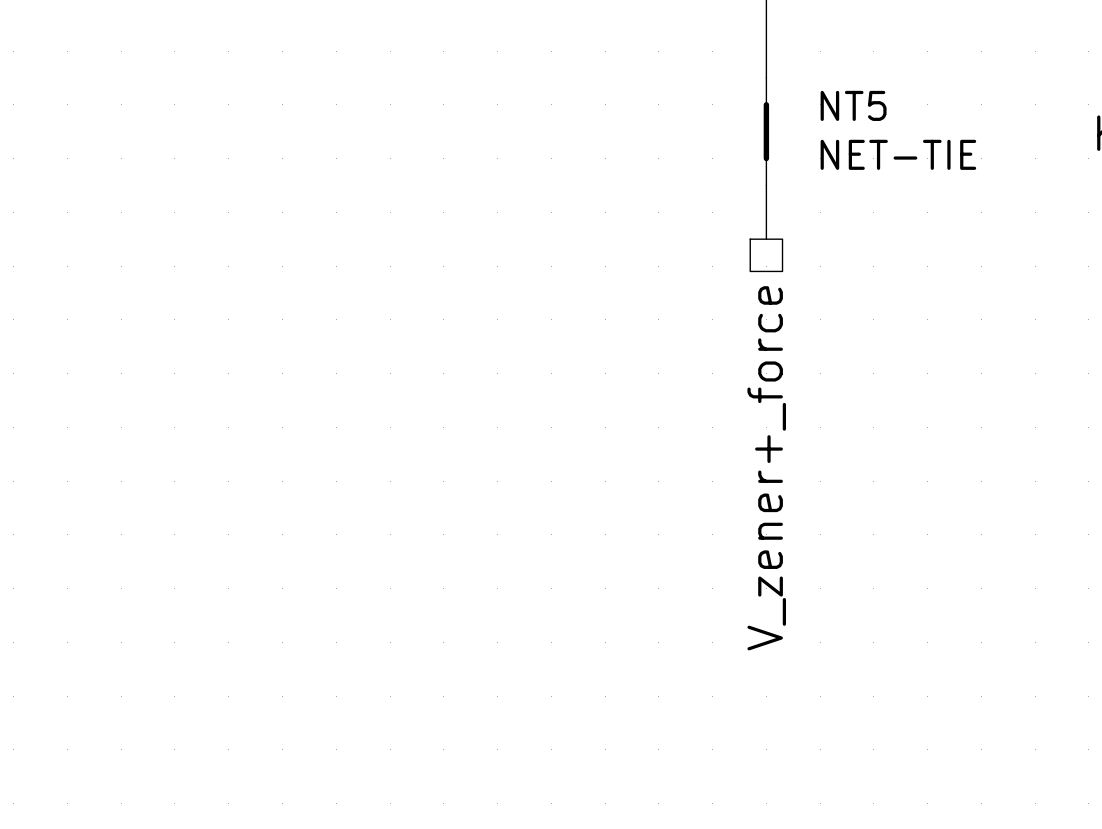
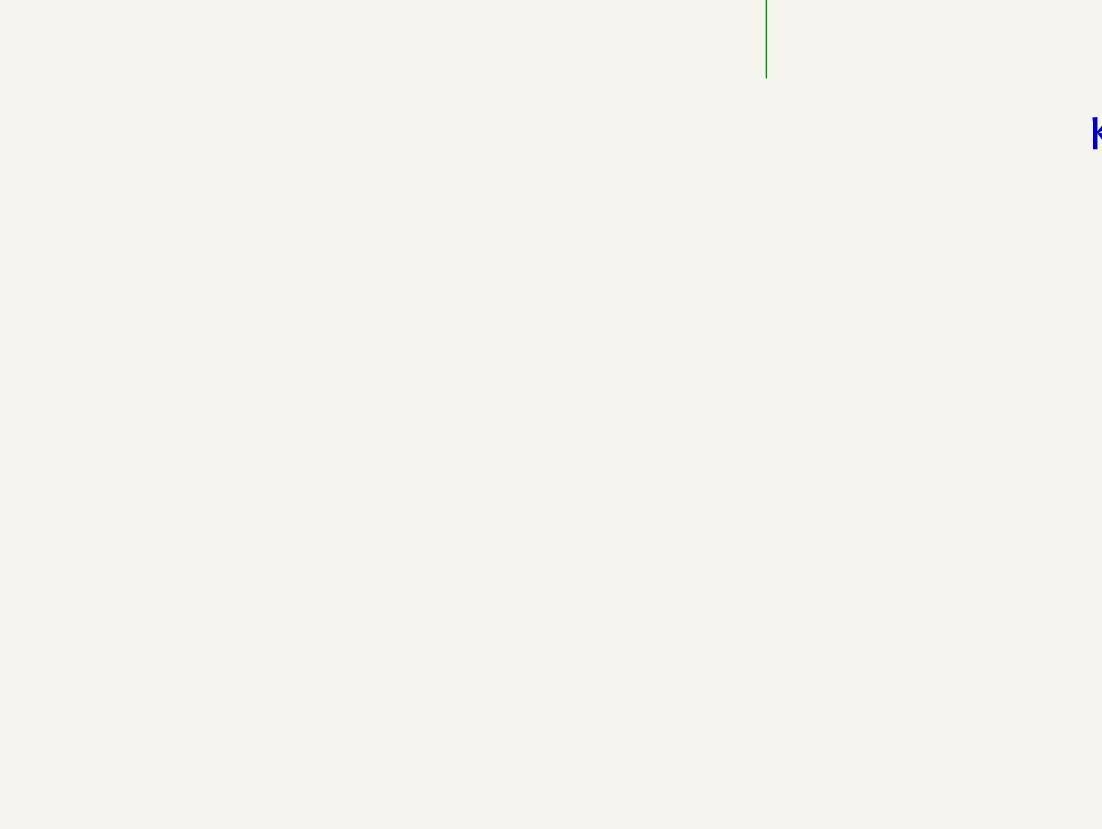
NT5: NET-TIE (766, 131) -> none
wire: (766, 185) (766, 239) -> none
hierarchical label: V_zener+_force (766, 468) -> none

